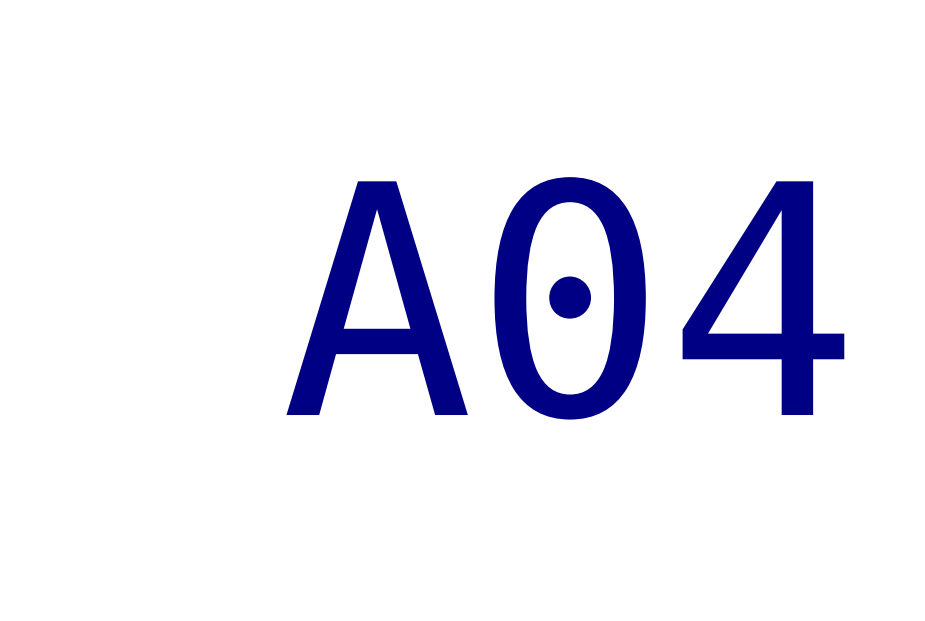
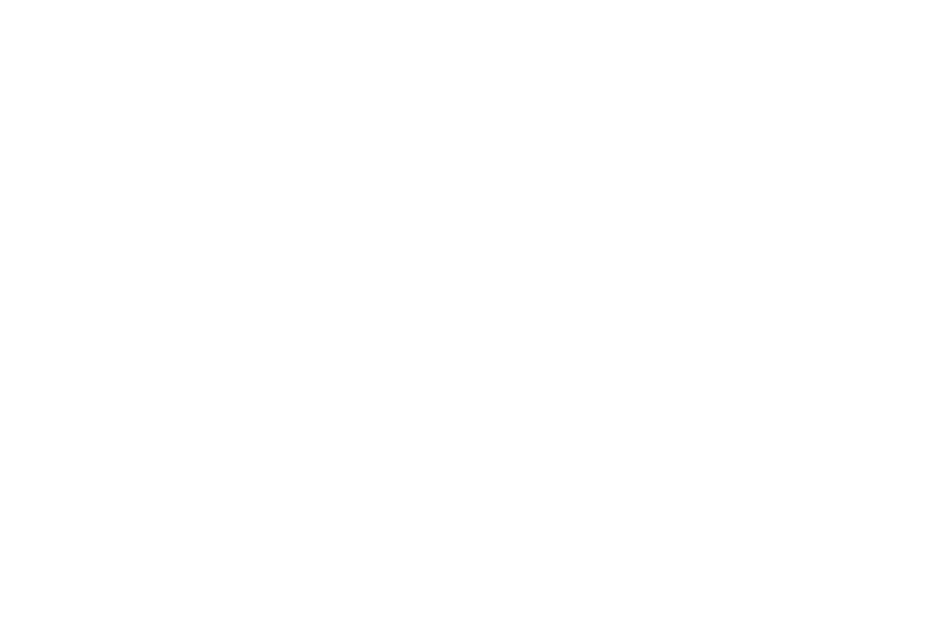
text: A04 (565, 298) -> none

